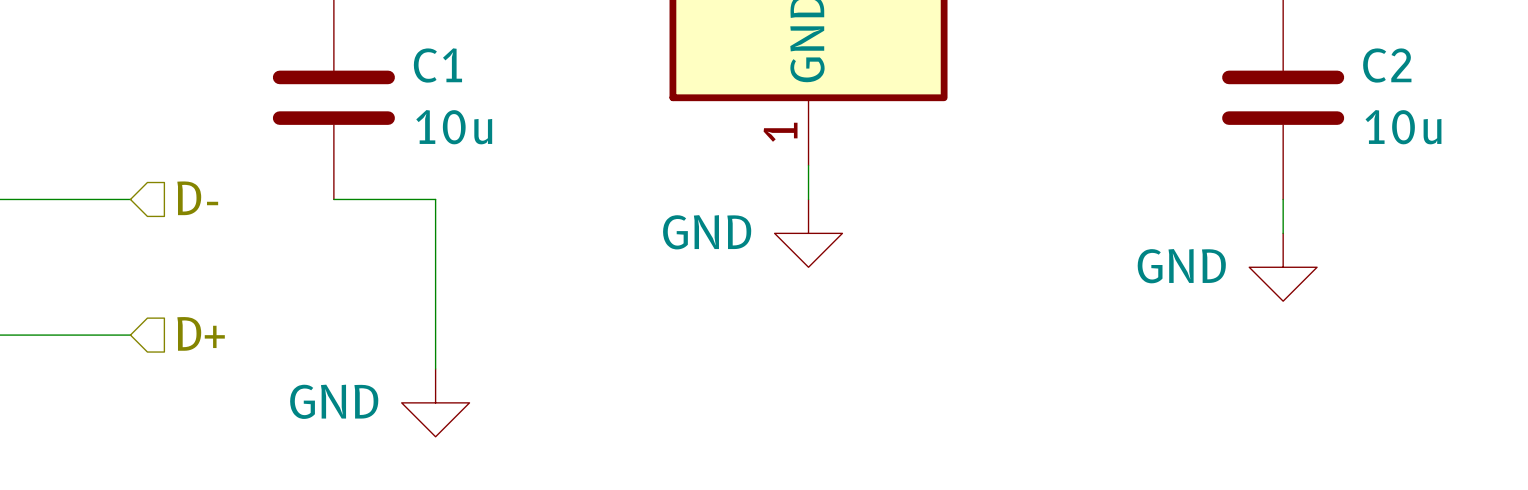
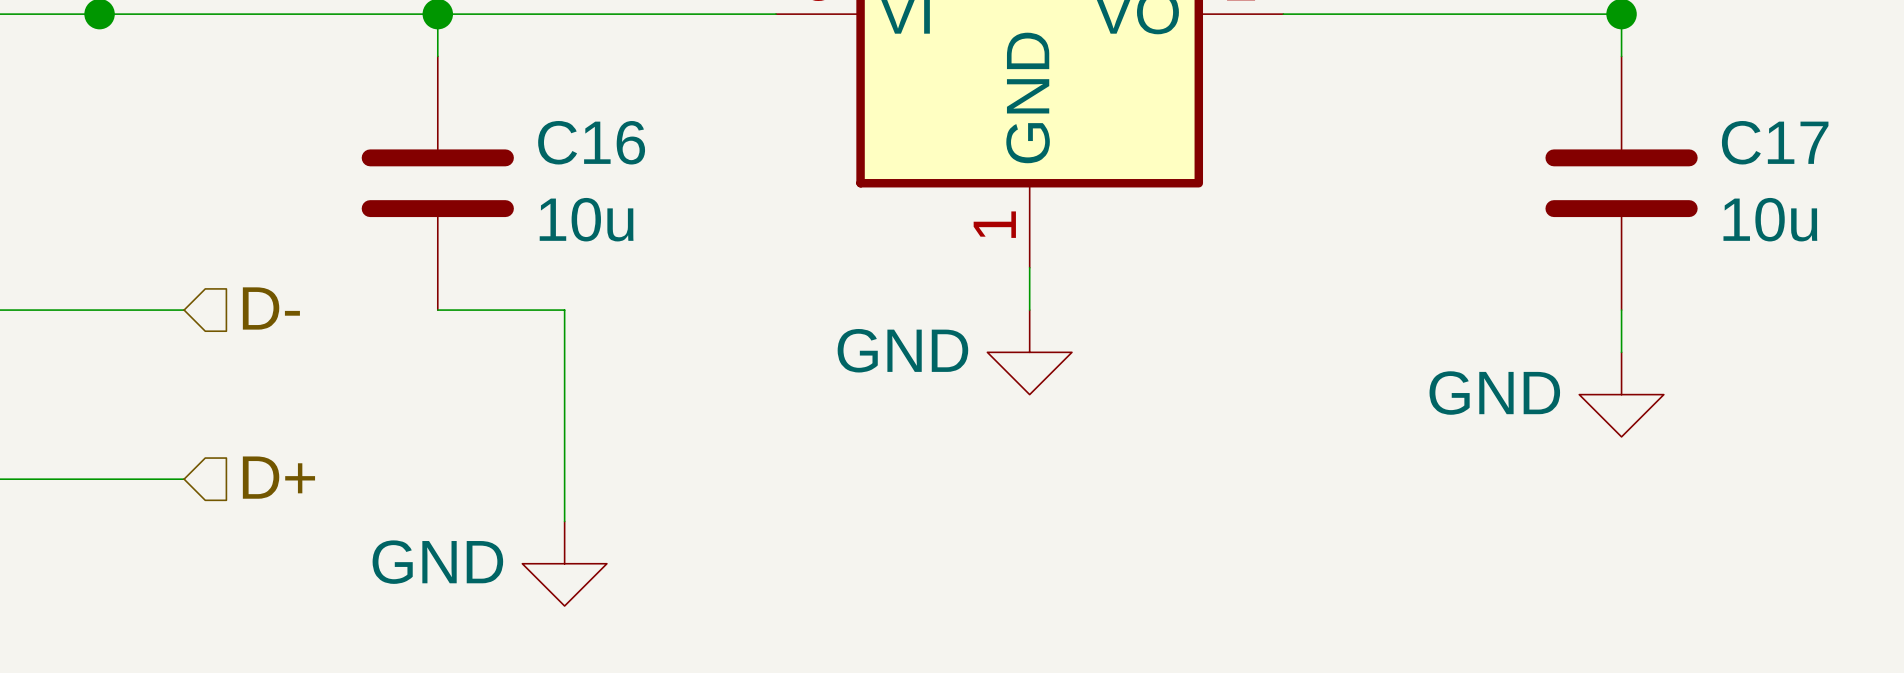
C1 name: C1 (437, 65) -> C16 (591, 142)
C2 name: C2 (1387, 65) -> C17 (1775, 142)

